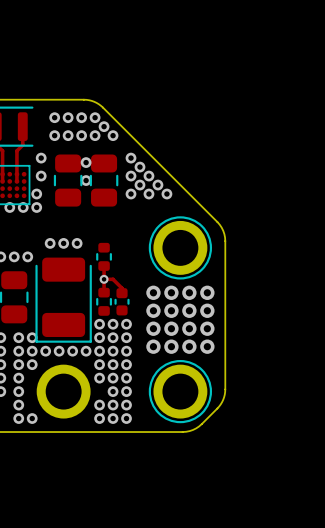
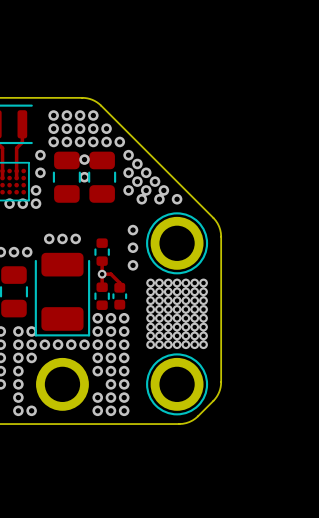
via: (104, 126) -> none
via: none -> (53, 128)
via: none -> (66, 128)
via: none -> (80, 128)
via: none -> (93, 128)
via: none -> (106, 128)
via: (54, 135) -> none
via: (68, 135) -> none
via: (81, 135) -> none
via: (95, 135) -> none
via: (113, 135) -> none
via: none -> (53, 141)
via: none -> (66, 141)
via: none -> (80, 141)
via: none -> (93, 141)
via: none -> (106, 141)
via: none -> (119, 141)
via: none -> (141, 199)
via: none -> (159, 199)
via: none -> (177, 199)
via: none -> (132, 230)
via: none -> (132, 247)
via: none -> (132, 265)
via: none -> (150, 282)
via: none -> (159, 282)
via: none -> (168, 282)
via: none -> (177, 282)
via: none -> (185, 282)
via: none -> (194, 282)
via: none -> (203, 282)
via: (153, 292) -> none
via: (171, 292) -> none
via: (189, 292) -> none
via: (207, 292) -> none
via: none -> (150, 291)
via: none -> (159, 291)
via: none -> (168, 291)
via: none -> (177, 291)
via: none -> (185, 291)
via: none -> (194, 291)
via: none -> (203, 291)
via: none -> (150, 300)
via: none -> (159, 300)
via: none -> (168, 300)
via: none -> (177, 300)
via: none -> (185, 300)
via: none -> (194, 300)
via: none -> (203, 300)
via: (153, 310) -> none
via: (171, 310) -> none
via: (189, 310) -> none
via: (207, 310) -> none
via: none -> (150, 309)
via: none -> (159, 309)
via: none -> (168, 309)
via: none -> (177, 309)
via: none -> (185, 309)
via: none -> (194, 309)
via: none -> (203, 309)
via: none -> (150, 318)
via: none -> (159, 318)
via: none -> (168, 318)
via: none -> (177, 318)
via: none -> (185, 318)
via: none -> (194, 318)
via: none -> (203, 318)
via: (153, 328) -> none
via: (171, 328) -> none
via: (189, 328) -> none
via: (207, 328) -> none
via: none -> (150, 327)
via: none -> (159, 327)
via: none -> (168, 327)
via: none -> (177, 327)
via: none -> (185, 327)
via: none -> (194, 327)
via: none -> (203, 327)
via: none -> (150, 335)
via: none -> (159, 335)
via: none -> (168, 335)
via: none -> (177, 335)
via: none -> (185, 335)
via: none -> (194, 335)
via: none -> (203, 335)
via: (153, 346) -> none
via: (171, 346) -> none
via: (189, 346) -> none
via: (207, 346) -> none
via: none -> (150, 344)
via: none -> (159, 344)
via: none -> (168, 344)
via: none -> (177, 344)
via: none -> (185, 344)
via: none -> (194, 344)
via: none -> (203, 344)

